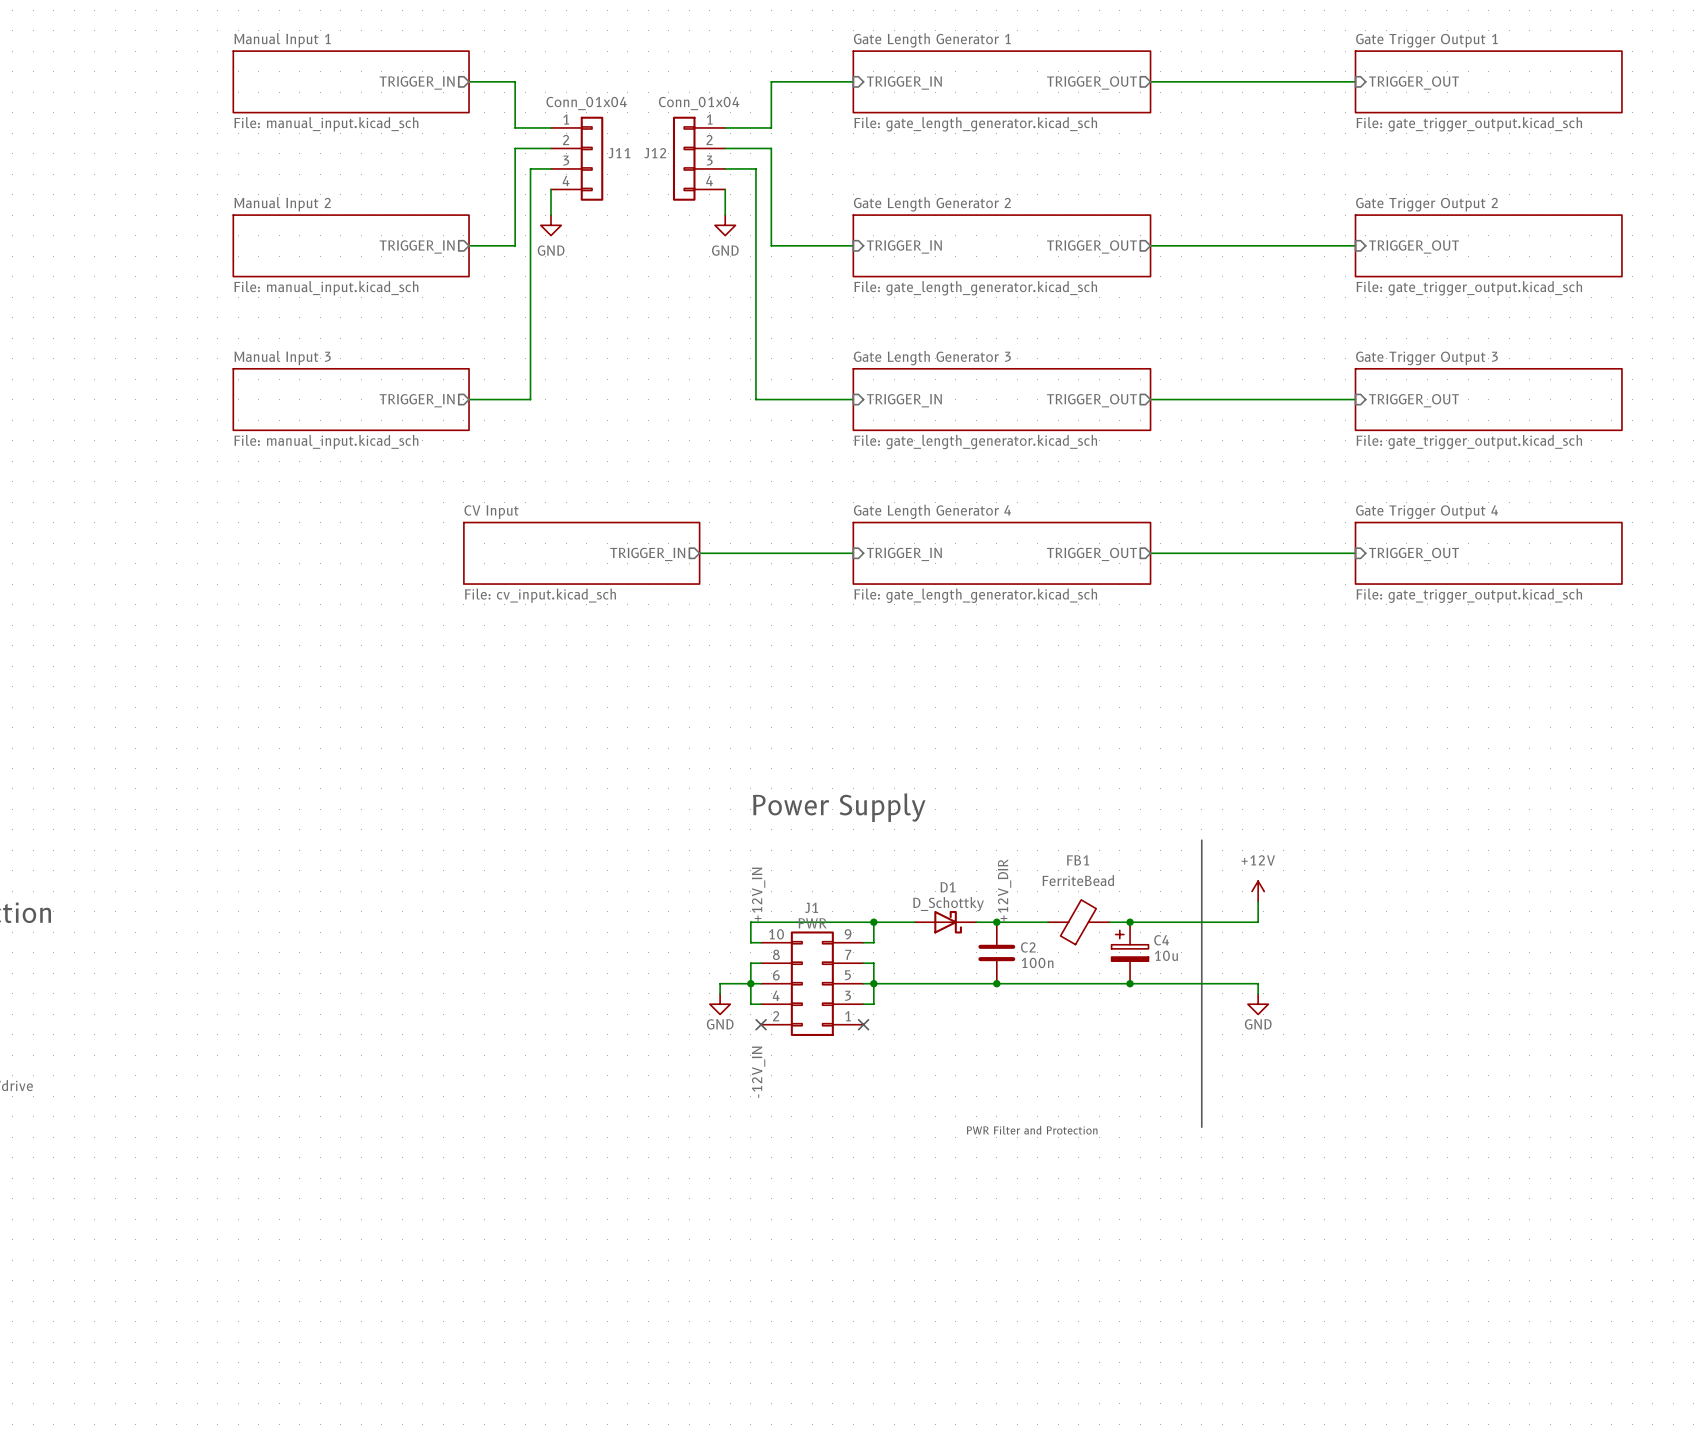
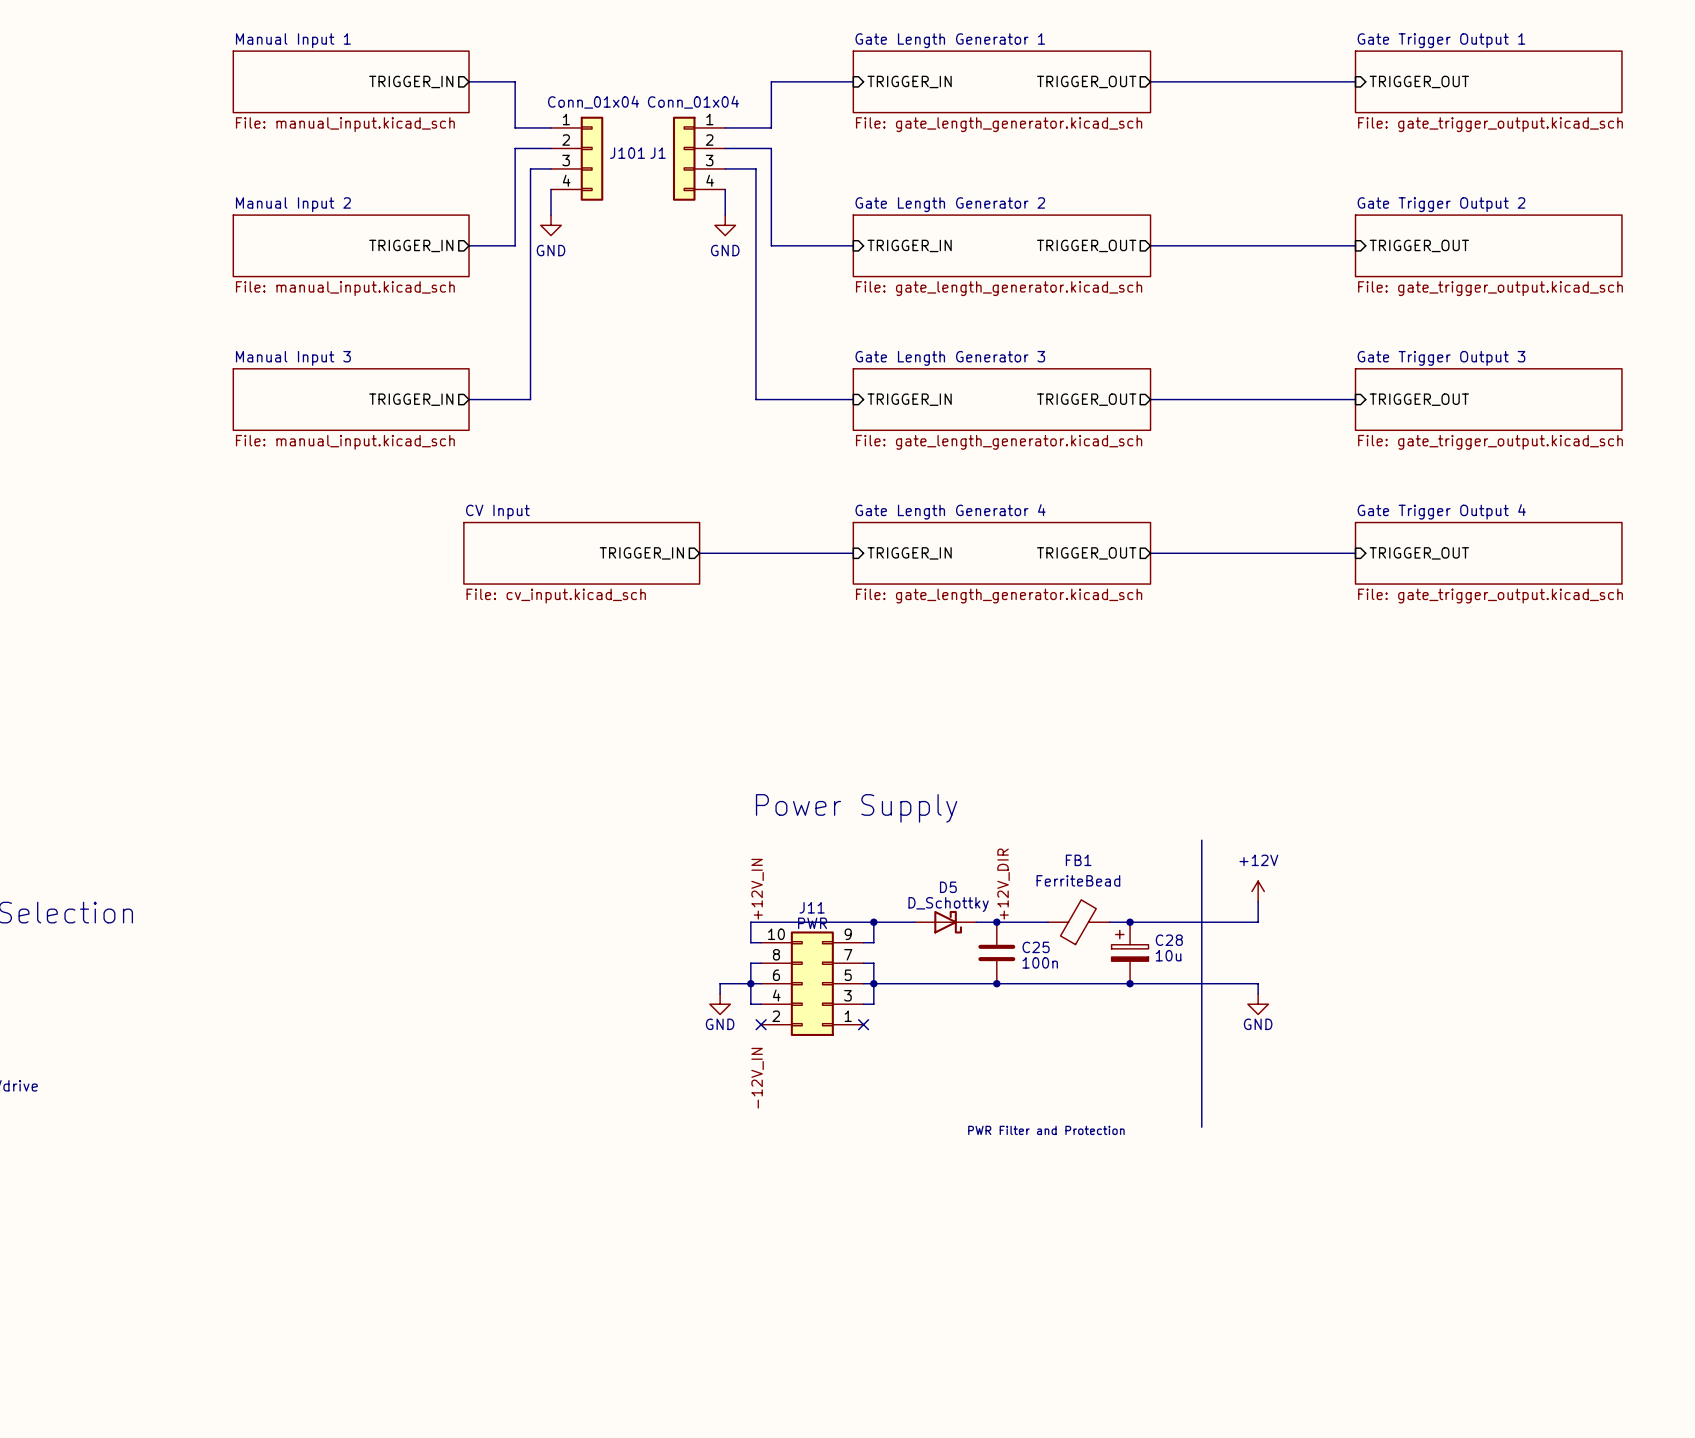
J11 name: J11 (619, 153) -> J101 (627, 153)
J12 name: J12 (655, 153) -> J1 (658, 153)
D1 name: D1 (947, 887) -> D5 (948, 887)
J1 name: J1 (811, 907) -> J11 (812, 907)
C4 name: C4 (1161, 940) -> C28 (1169, 940)
C2 name: C2 (1028, 947) -> C25 (1036, 947)

